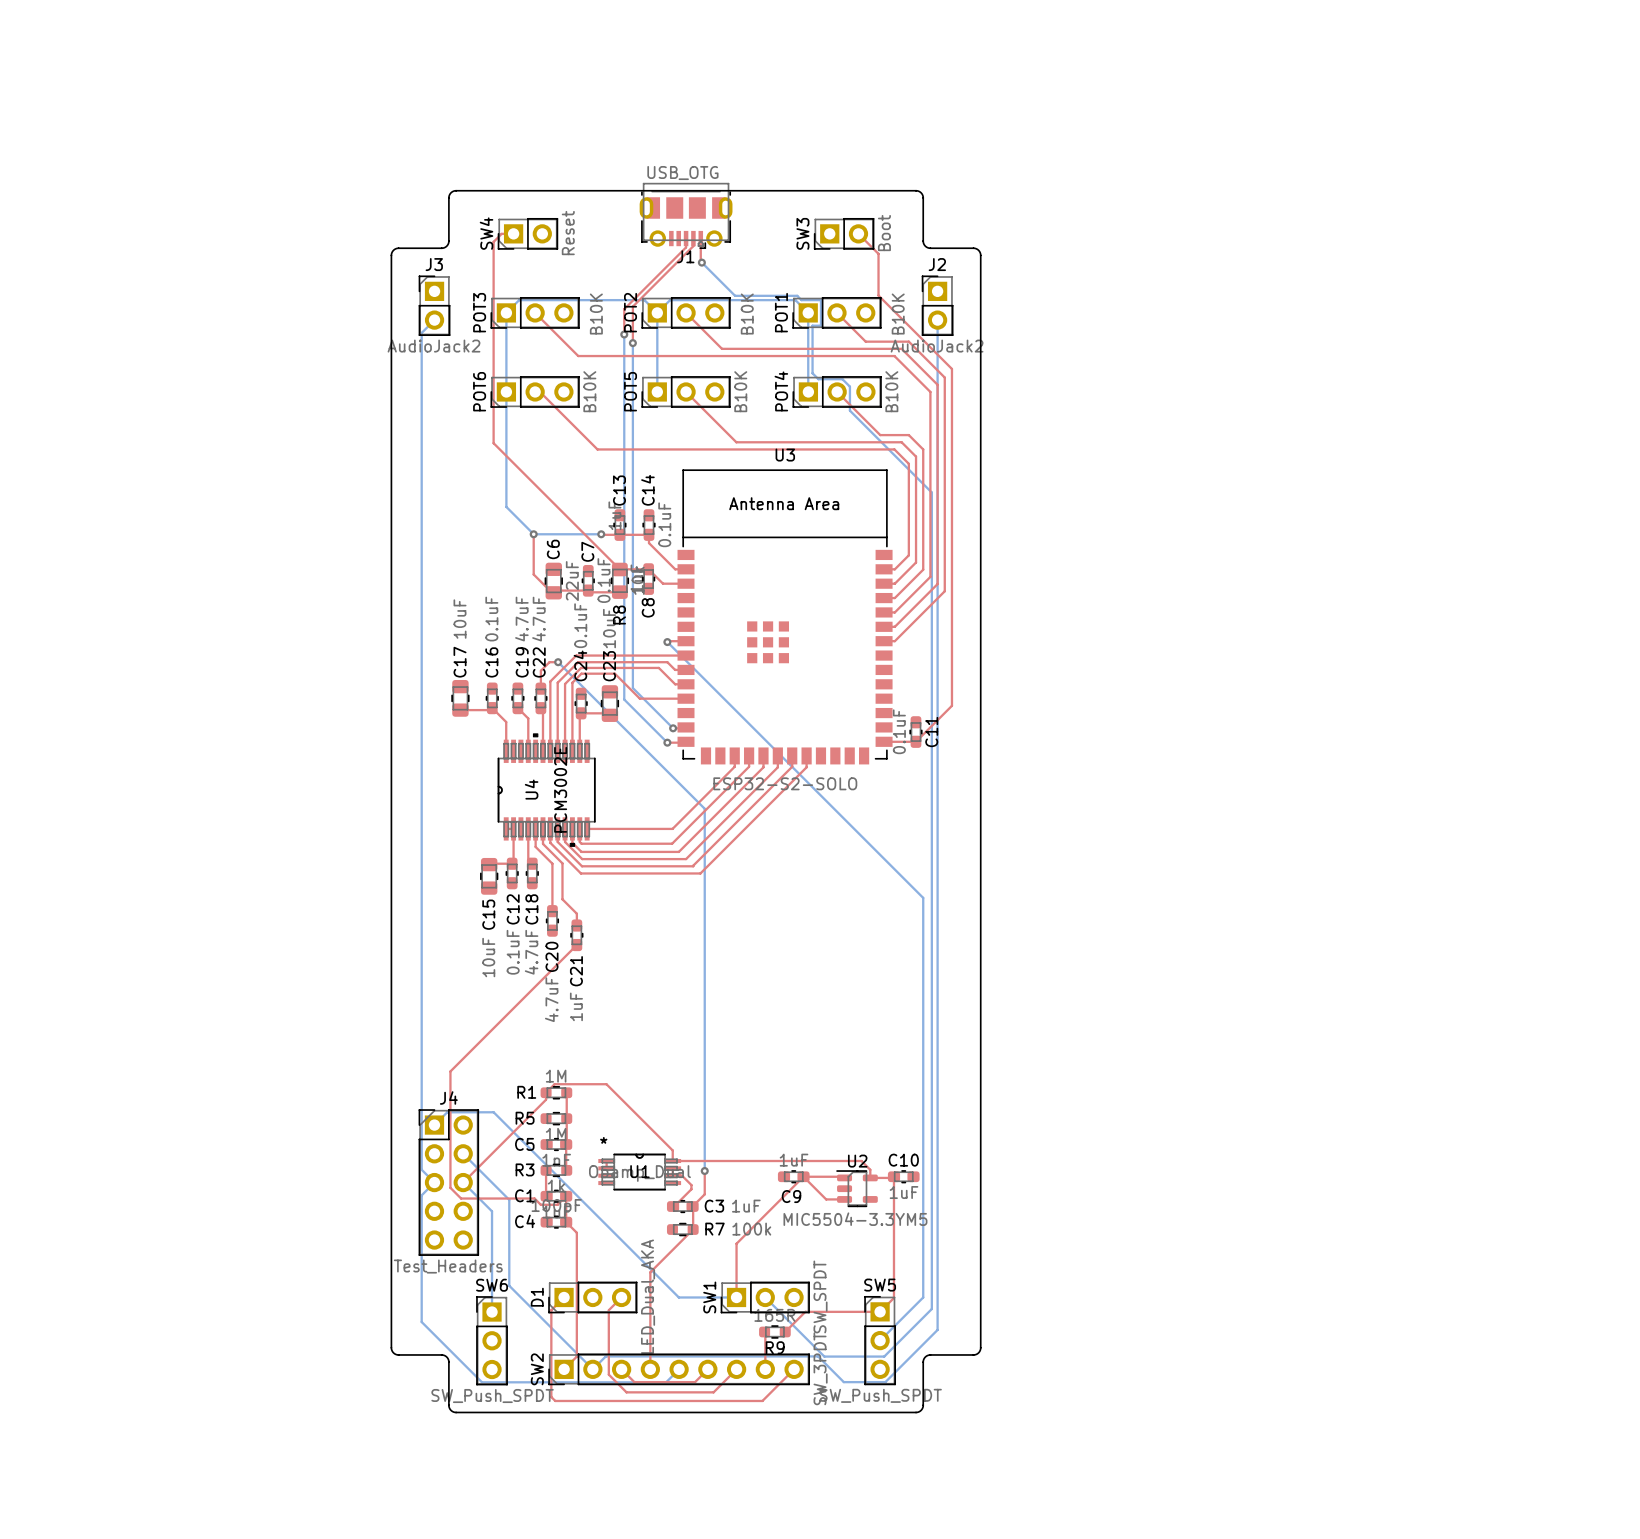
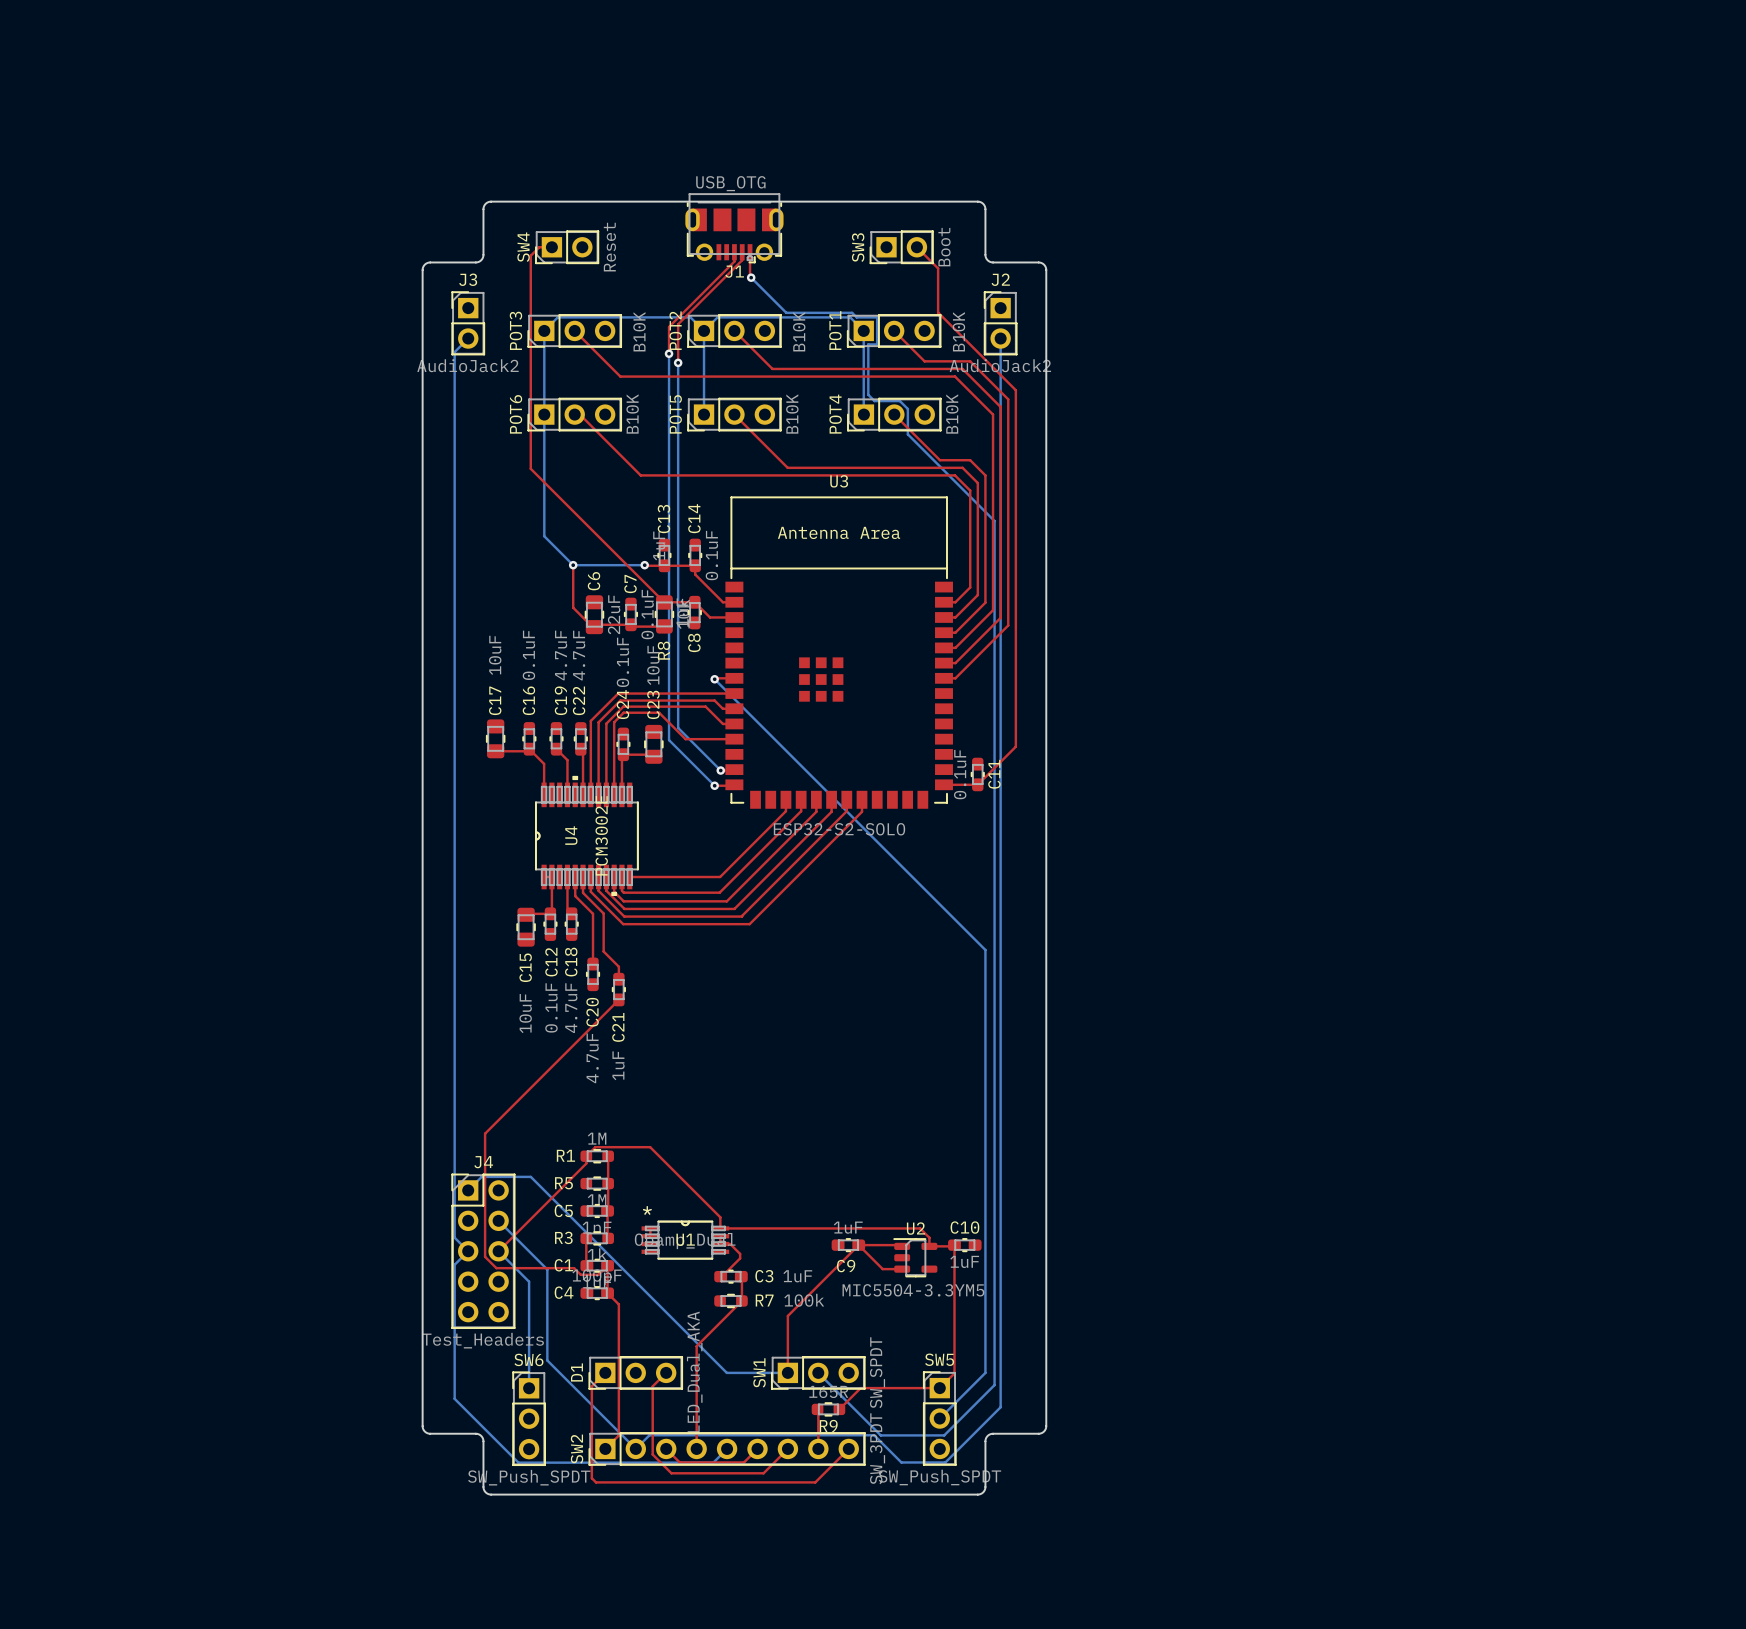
top track: (558, 662) (549, 662) (540, 670) (540, 688) -> none
bottom track: (558, 662) (704, 808) (704, 1171) -> none
via: (558, 662) -> none
top track: (704, 1171) (704, 1194) (692, 1206) -> none
via: (704, 1171) -> none

